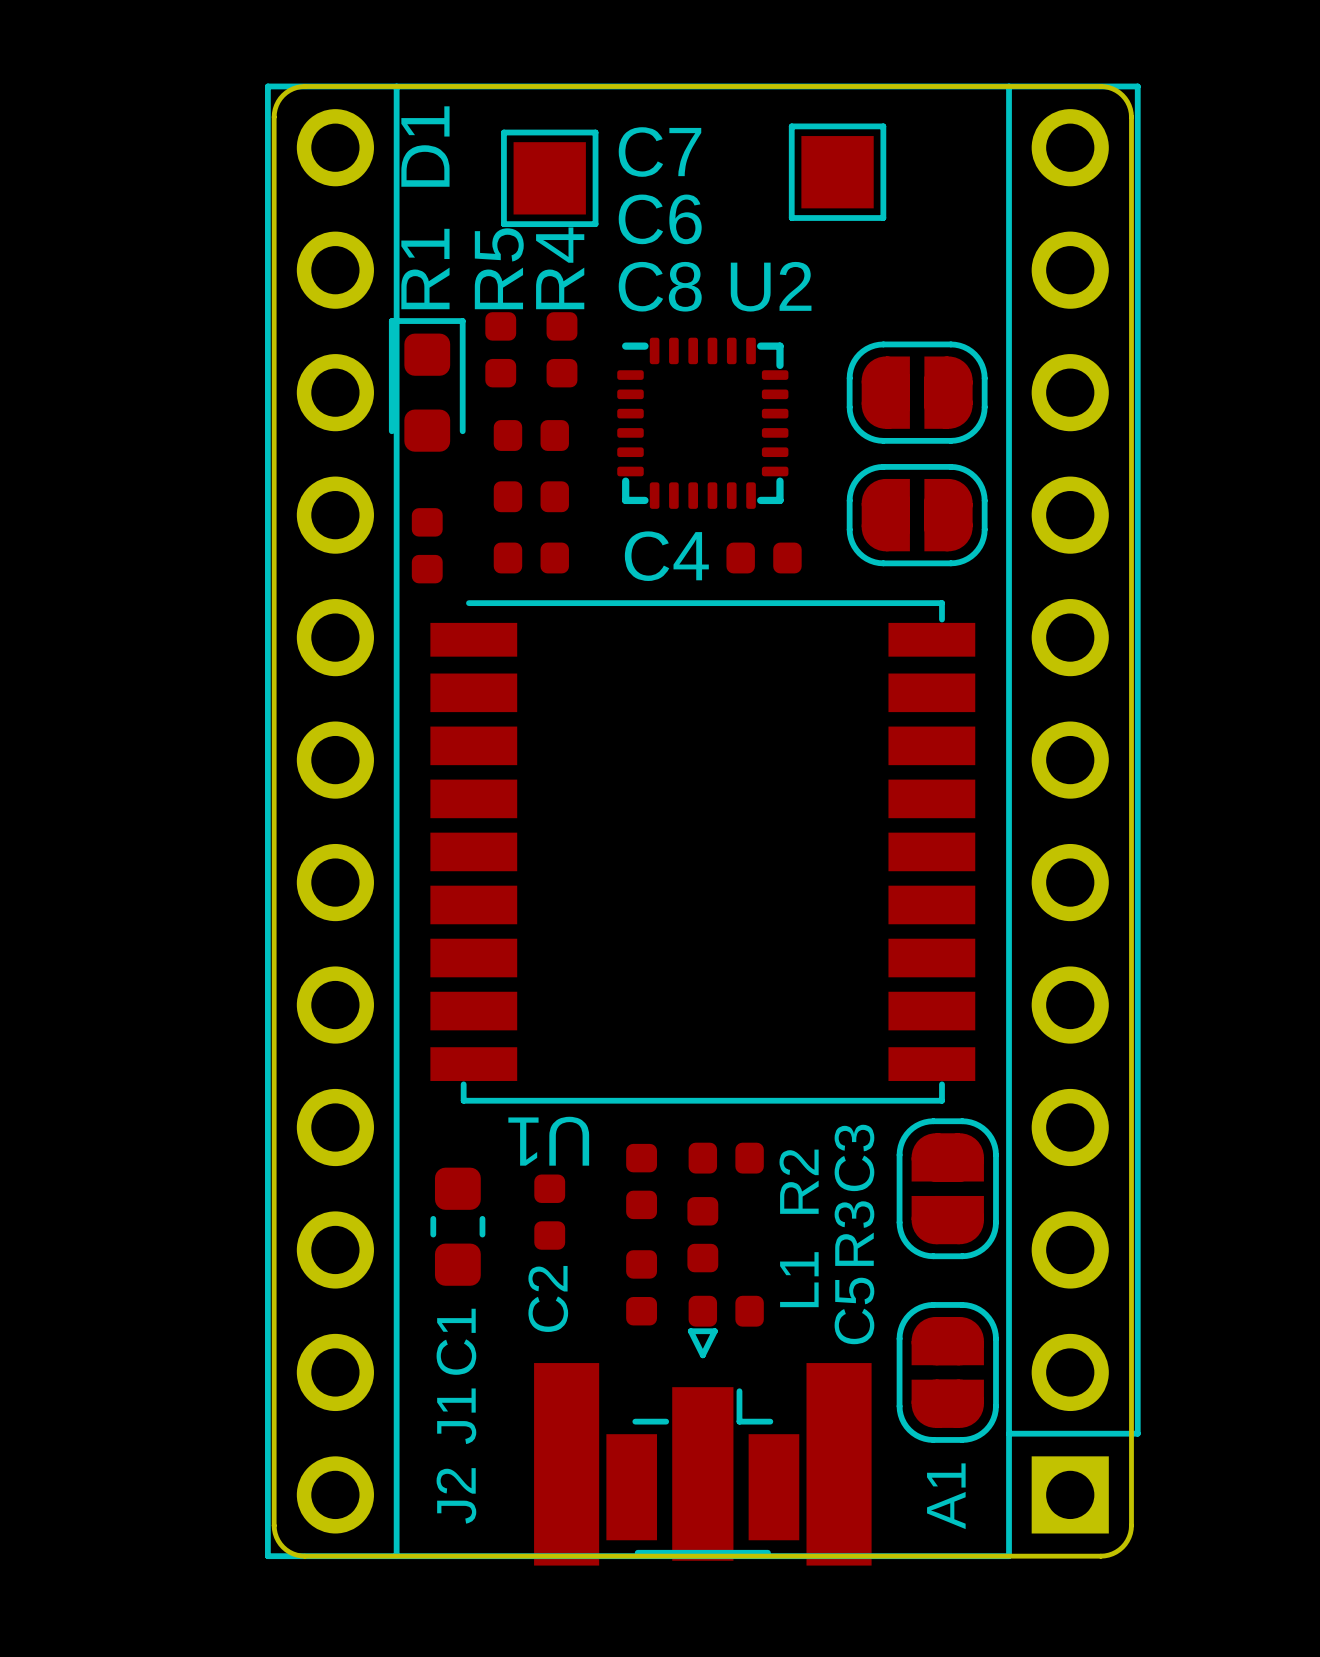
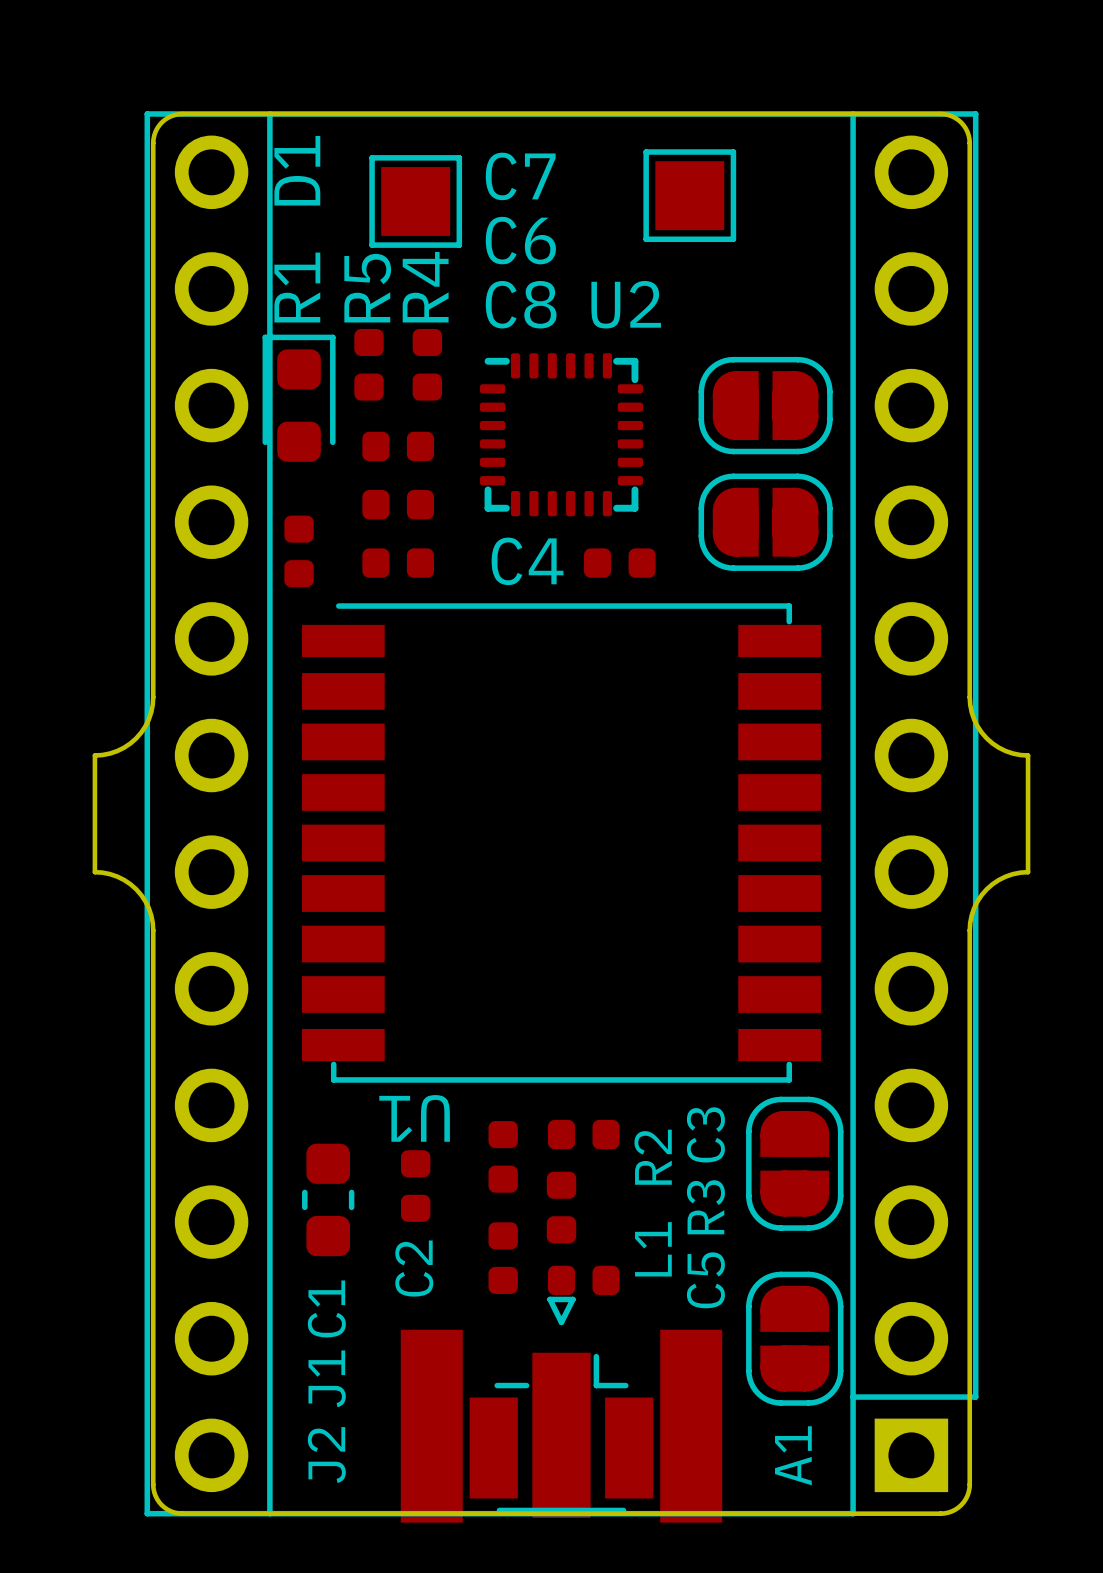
board edge: (274, 698) (274, 943) -> (153, 697) (148, 719) (136, 738) (117, 751) (94, 755) (94, 872) (117, 876) (136, 889) (148, 908) (153, 930)
board edge: (1131, 698) (1131, 943) -> (969, 697) (974, 719) (986, 738) (1005, 751) (1028, 755) (1028, 872) (1005, 876) (986, 889) (974, 908) (969, 930)

